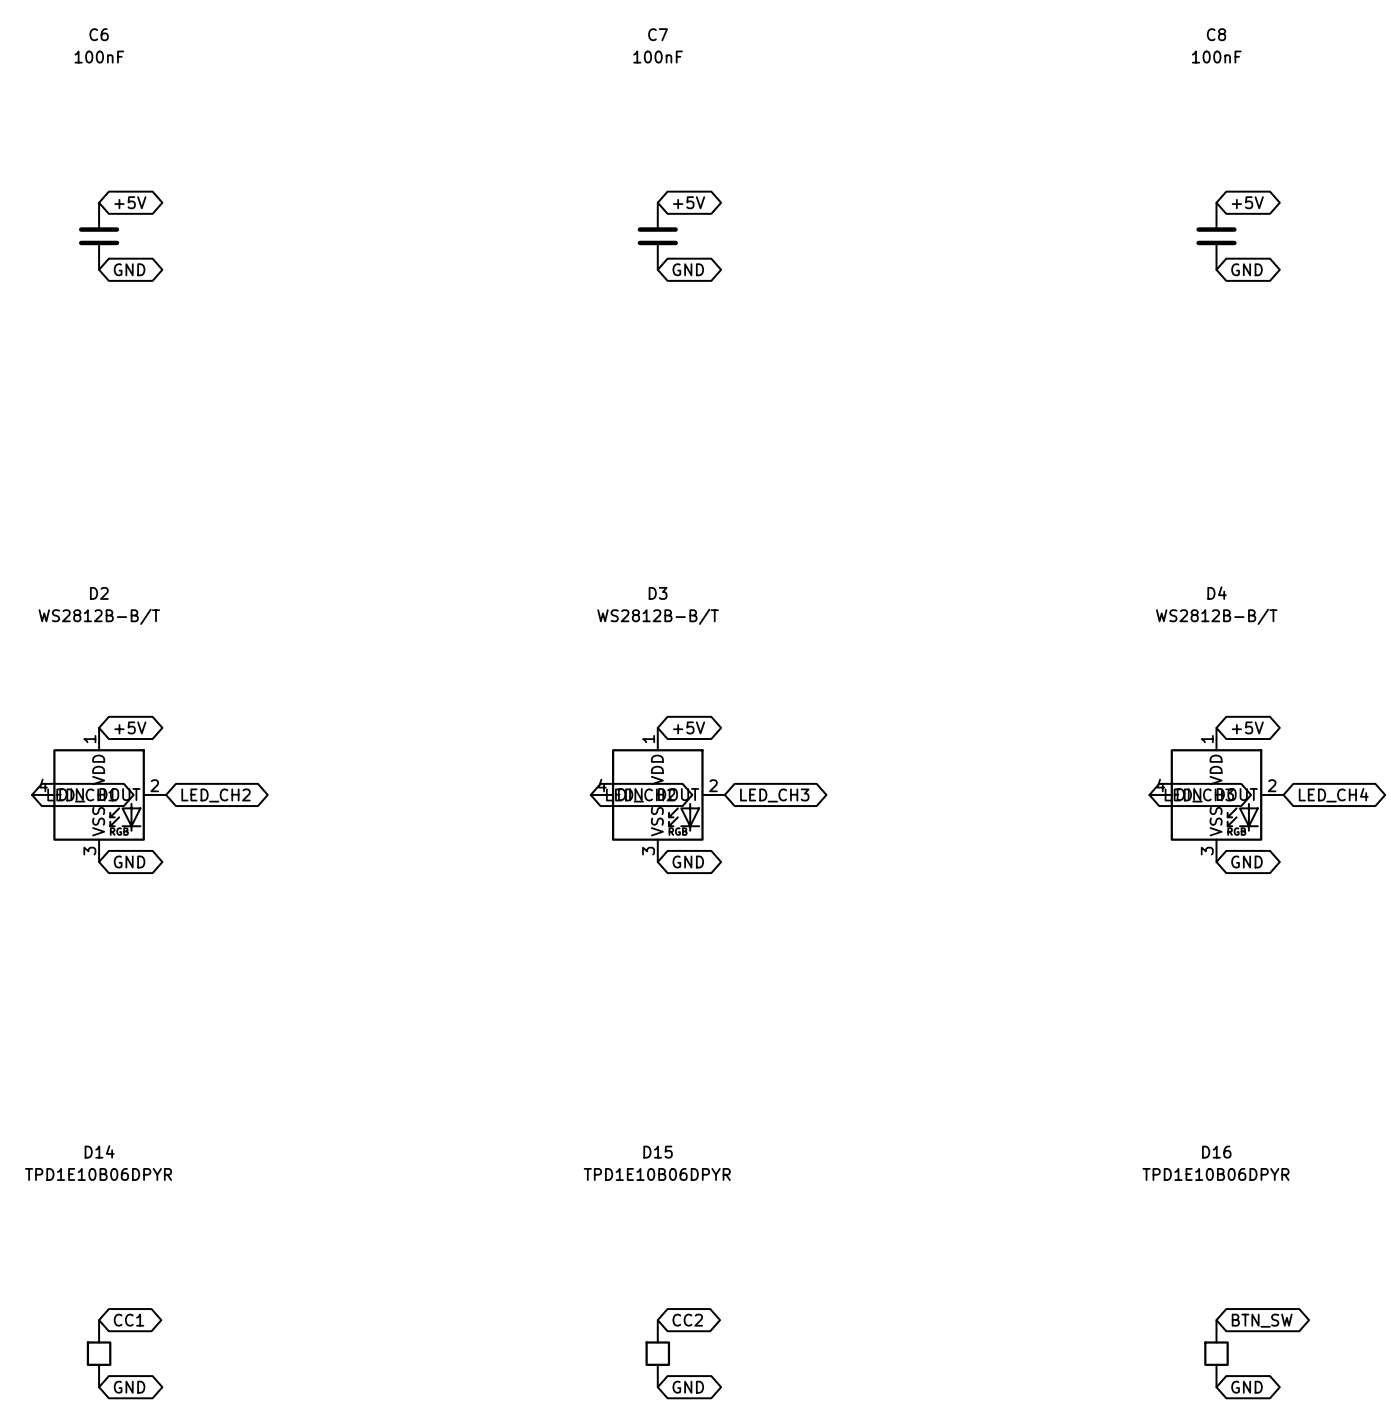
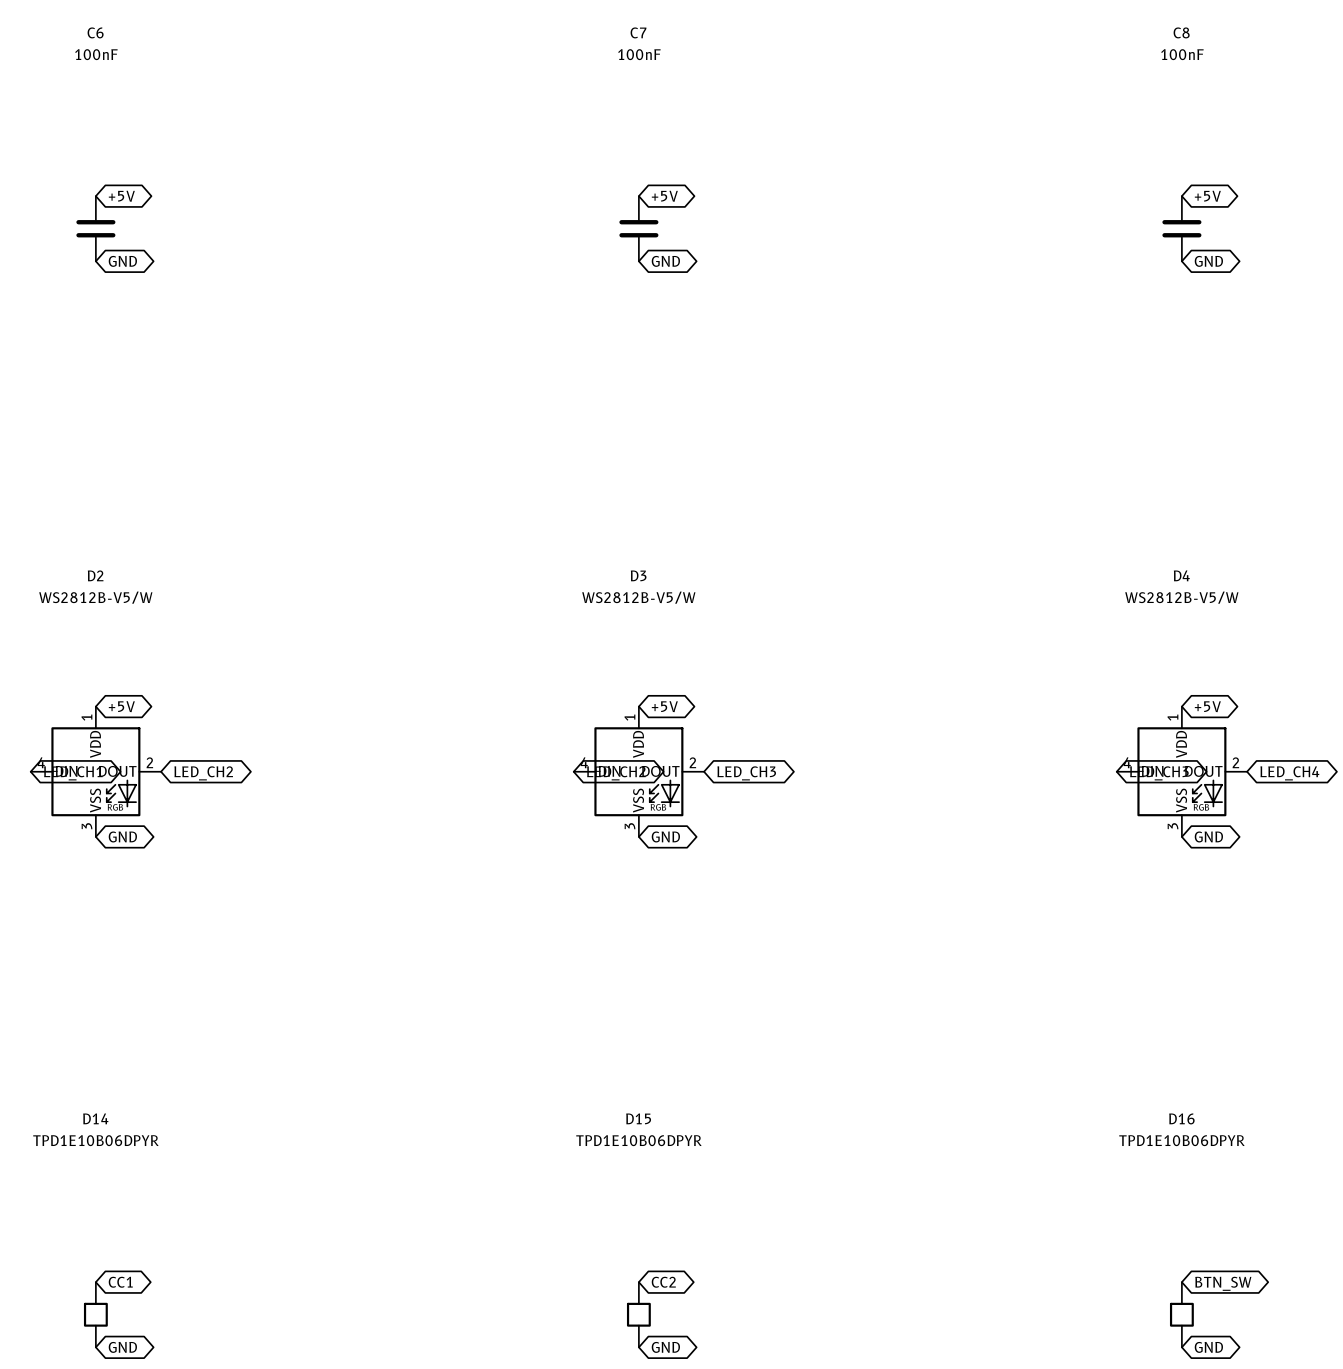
D2 value: WS2812B-B/T (99, 616) -> WS2812B-V5/W (95, 597)
D3 value: WS2812B-B/T (658, 616) -> WS2812B-V5/W (638, 597)
D4 value: WS2812B-B/T (1216, 616) -> WS2812B-V5/W (1181, 597)

